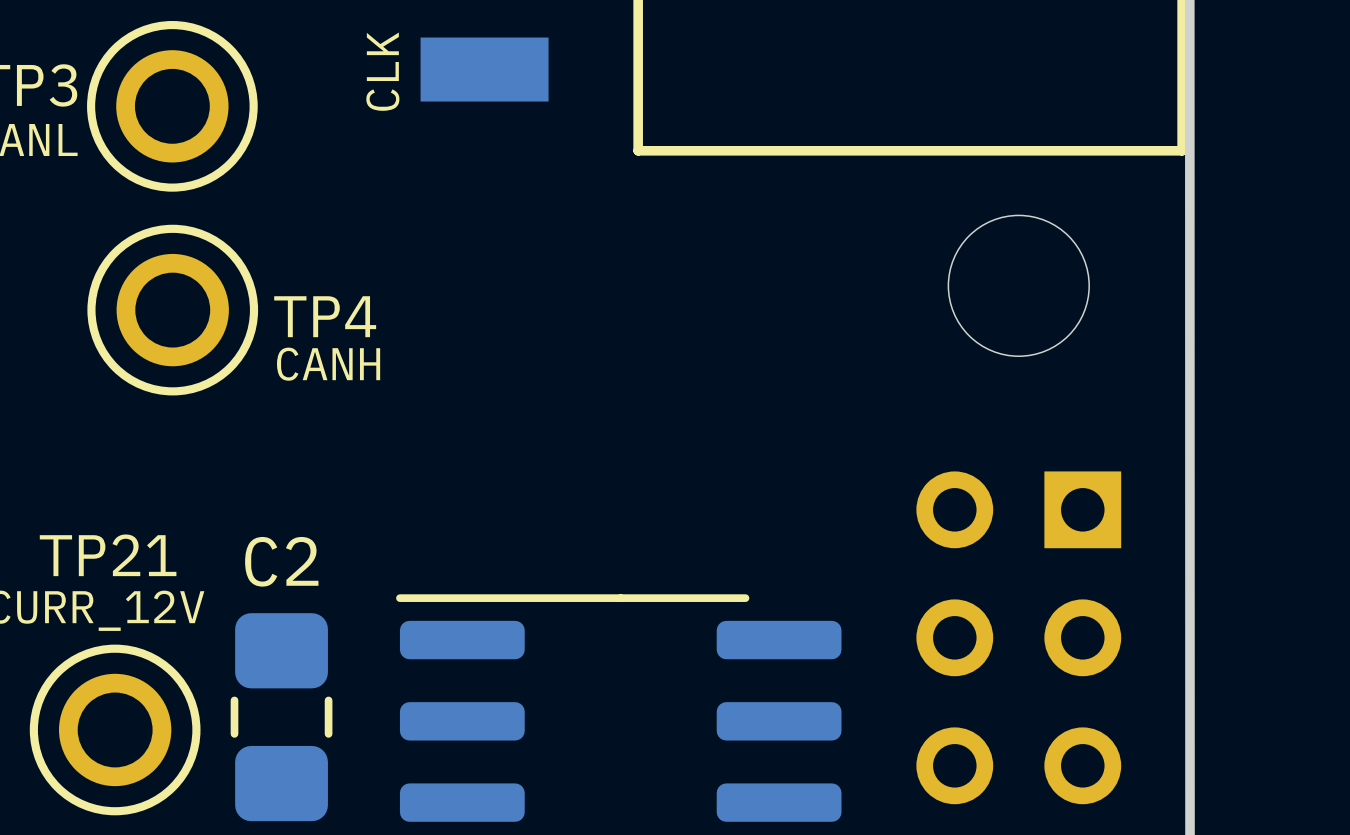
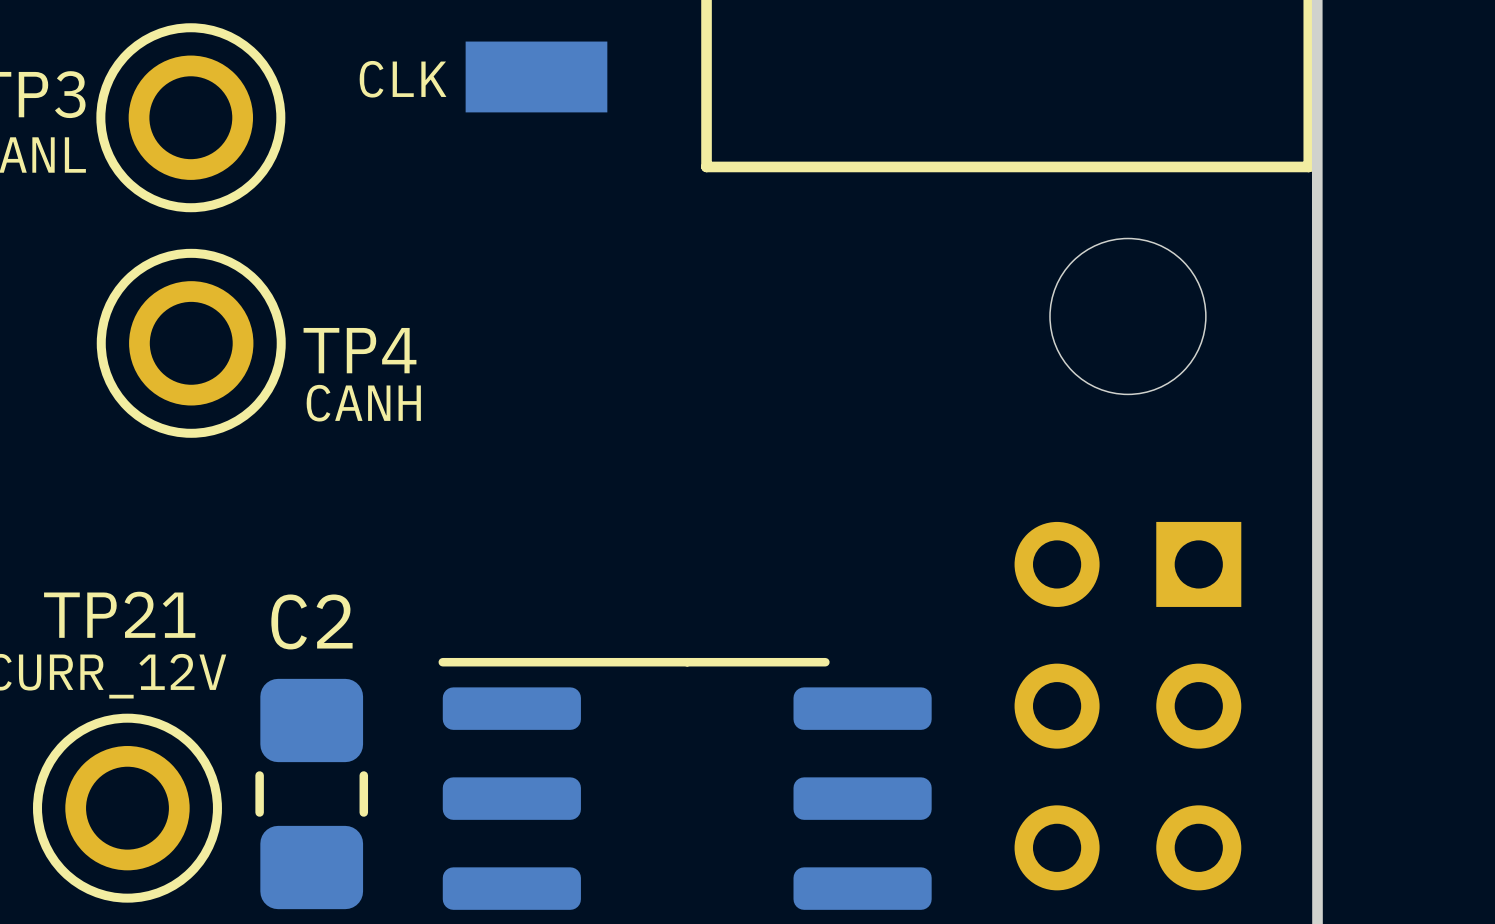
text rotation: 0° (382, 71) -> 90° clockwise (403, 79)

